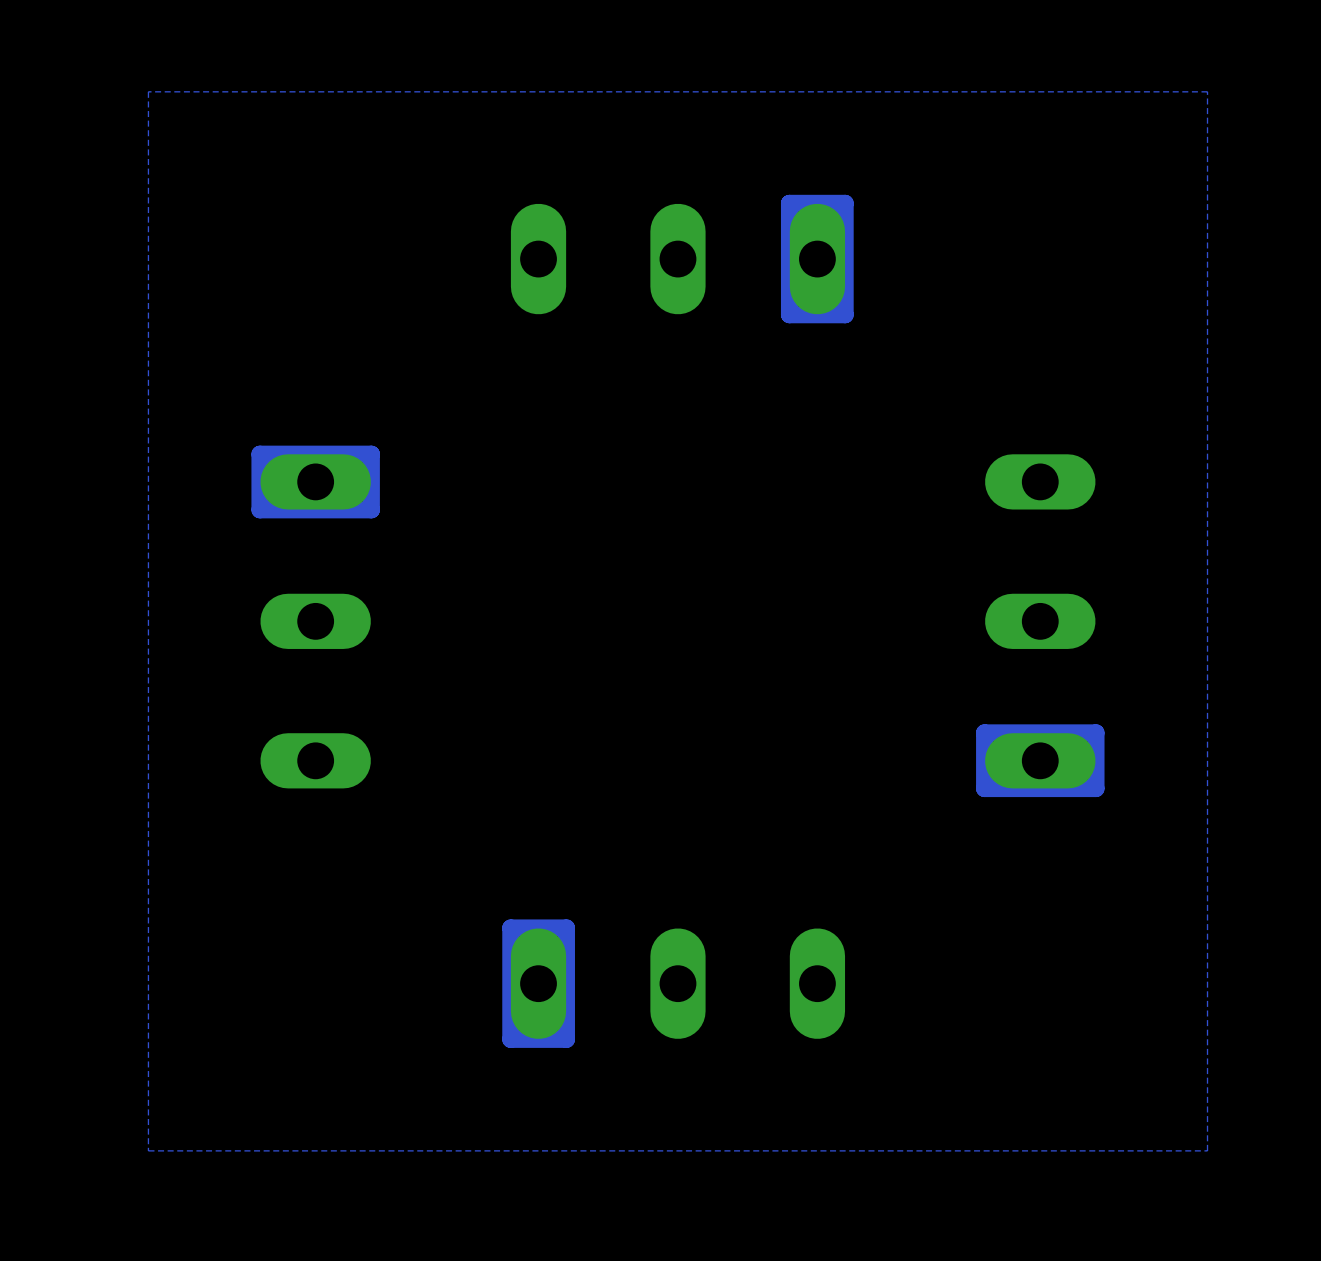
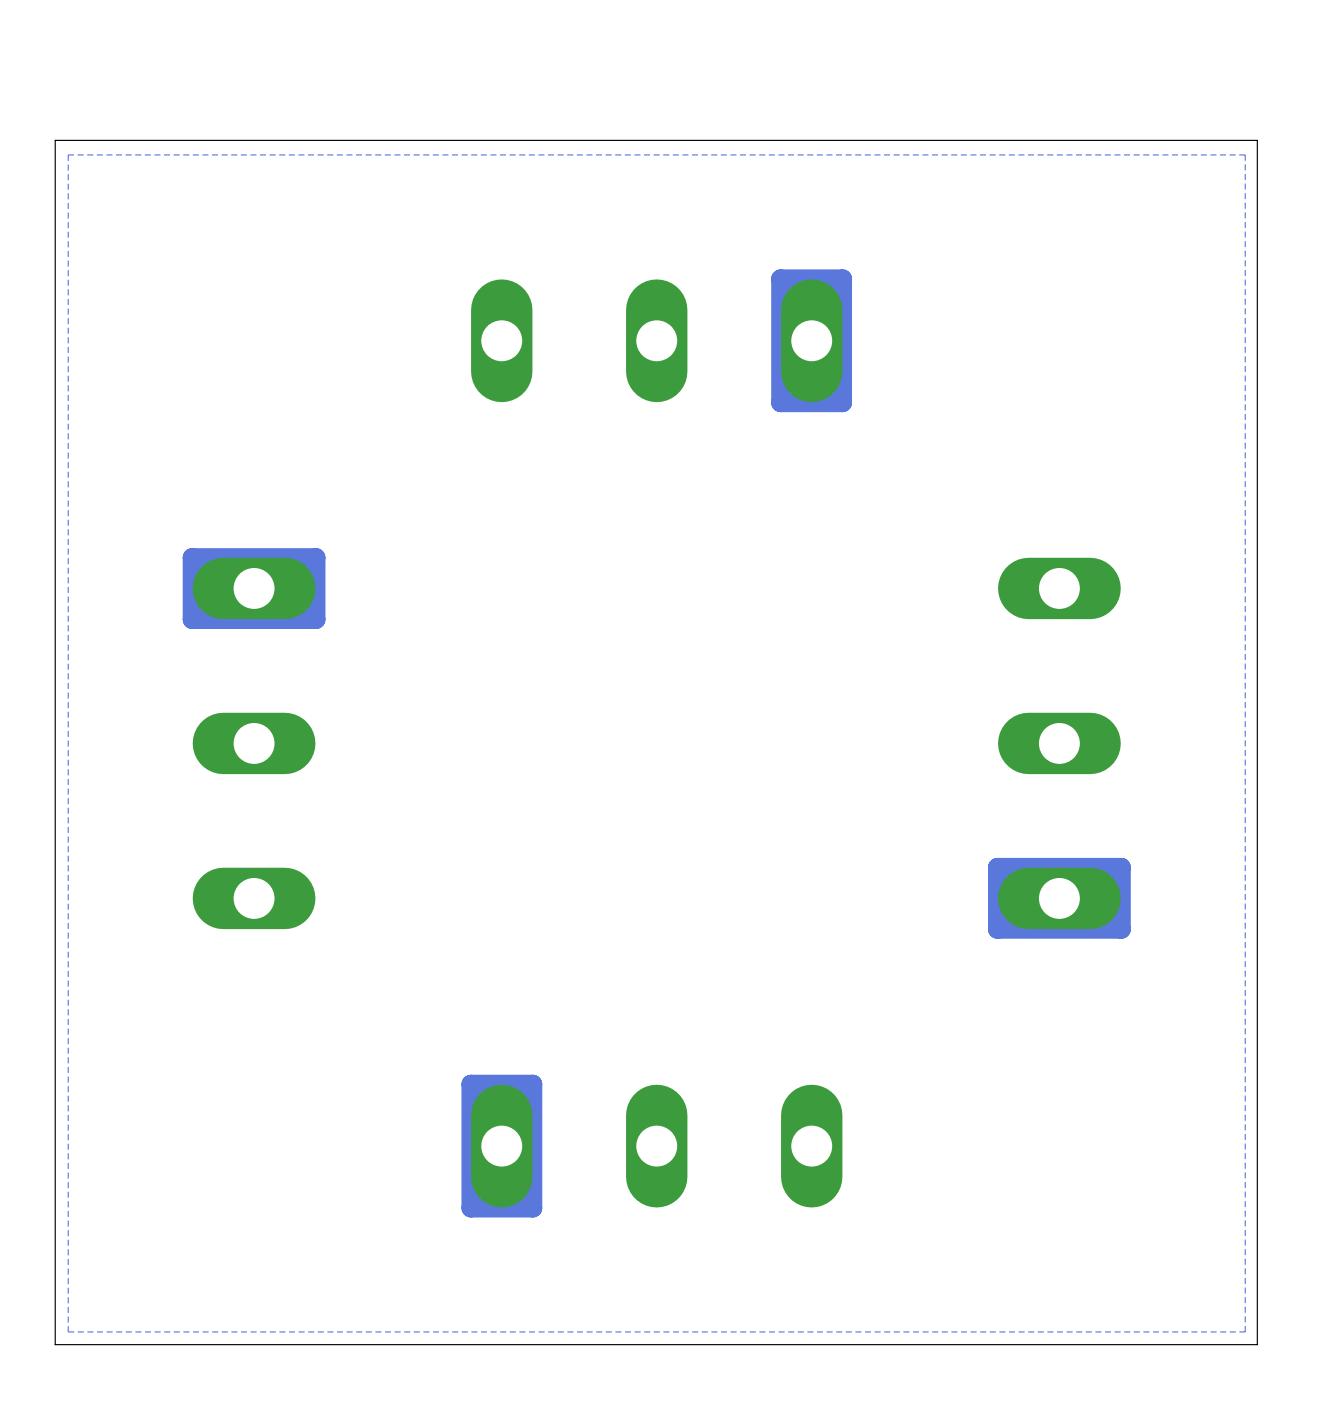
board edge: none -> (1257, 140) (55, 140) (55, 1344) (1257, 1344) (1257, 140)

